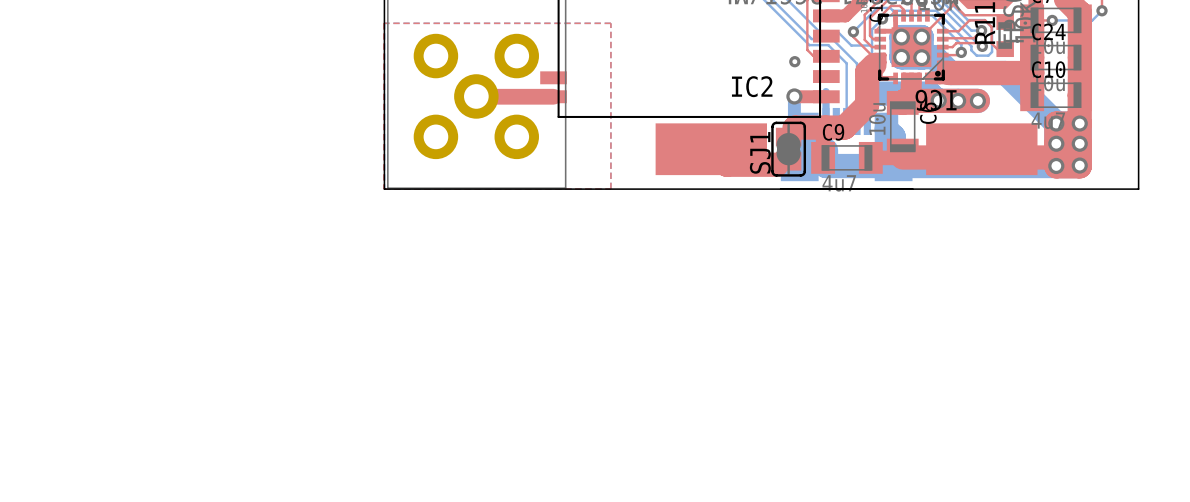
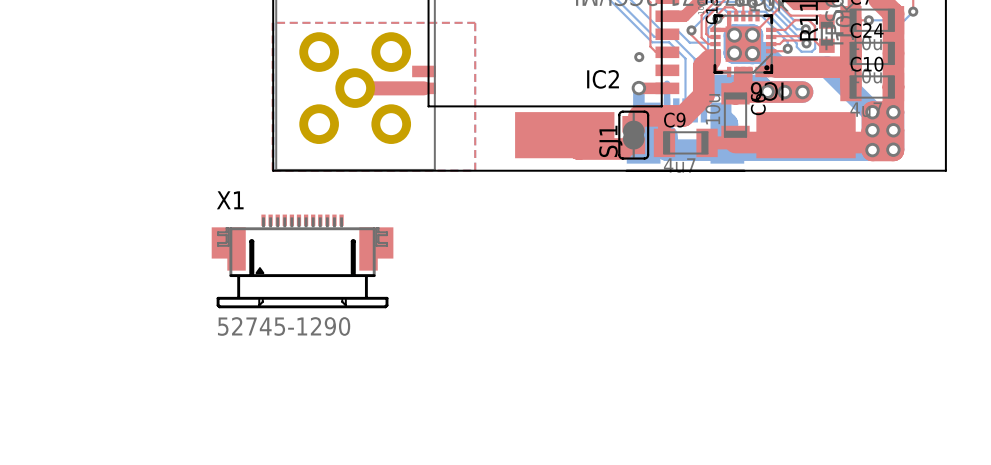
X1: none -> 52745-1290 (302, 261)

